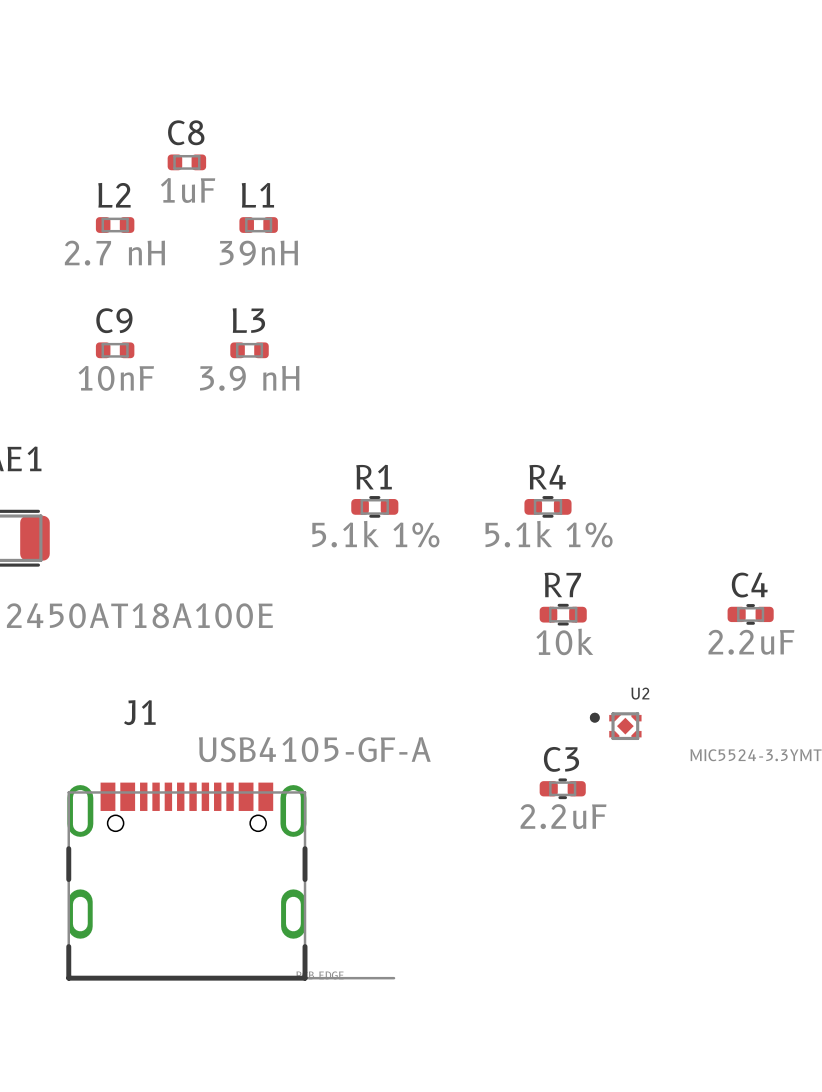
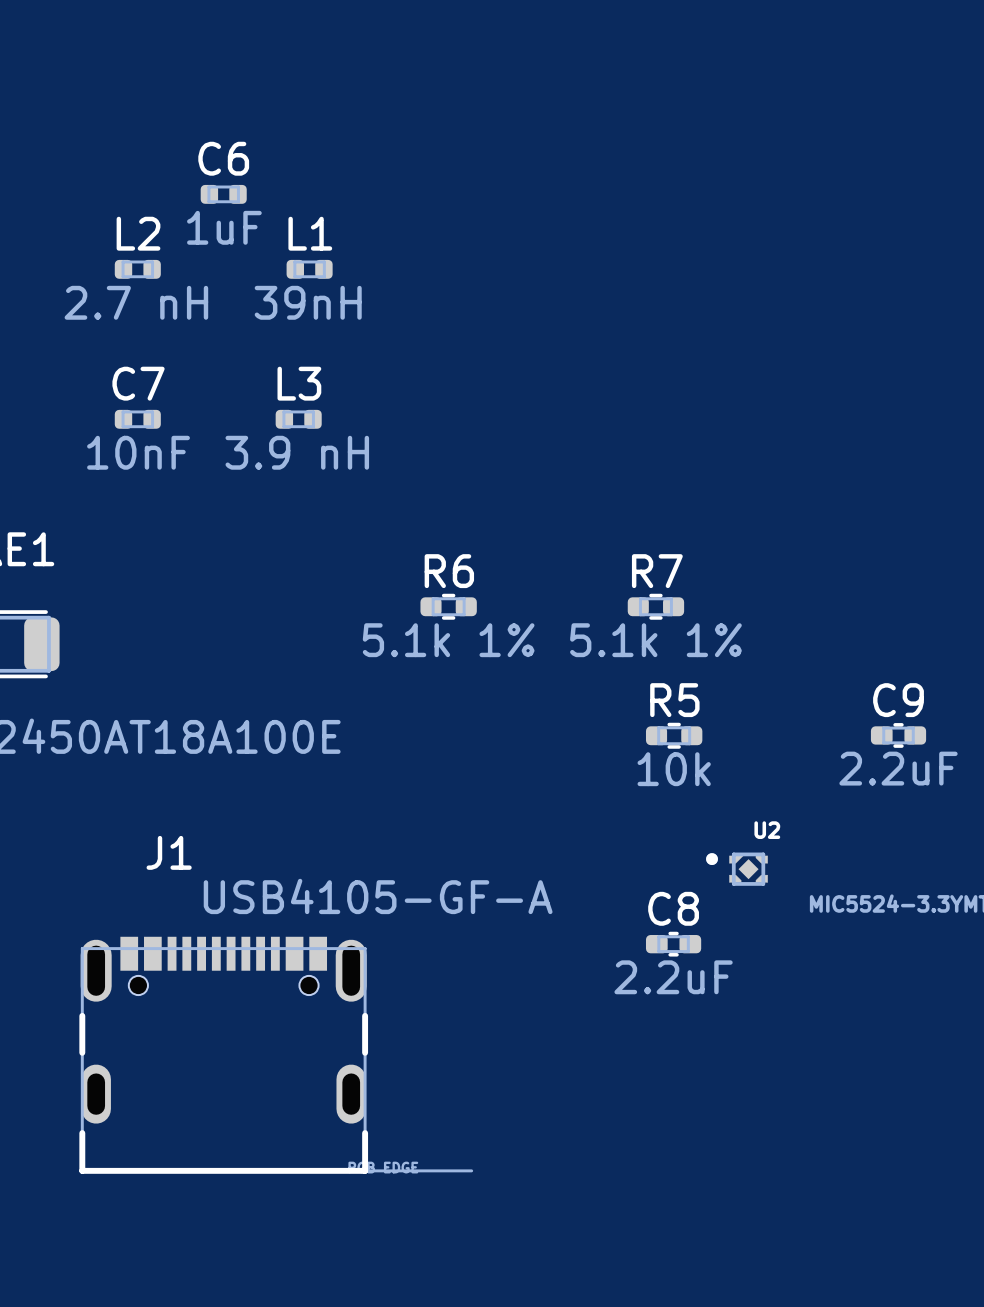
C8 name: C8 (186, 132) -> C6 (223, 158)
C9 name: C9 (114, 320) -> C7 (138, 383)
R1 name: R1 (374, 477) -> R6 (449, 571)
R4 name: R4 (547, 477) -> R7 (657, 571)
R7 name: R7 (562, 584) -> R5 (674, 700)
C4 name: C4 (749, 585) -> C9 (898, 700)
C3 name: C3 (561, 759) -> C8 (673, 908)

